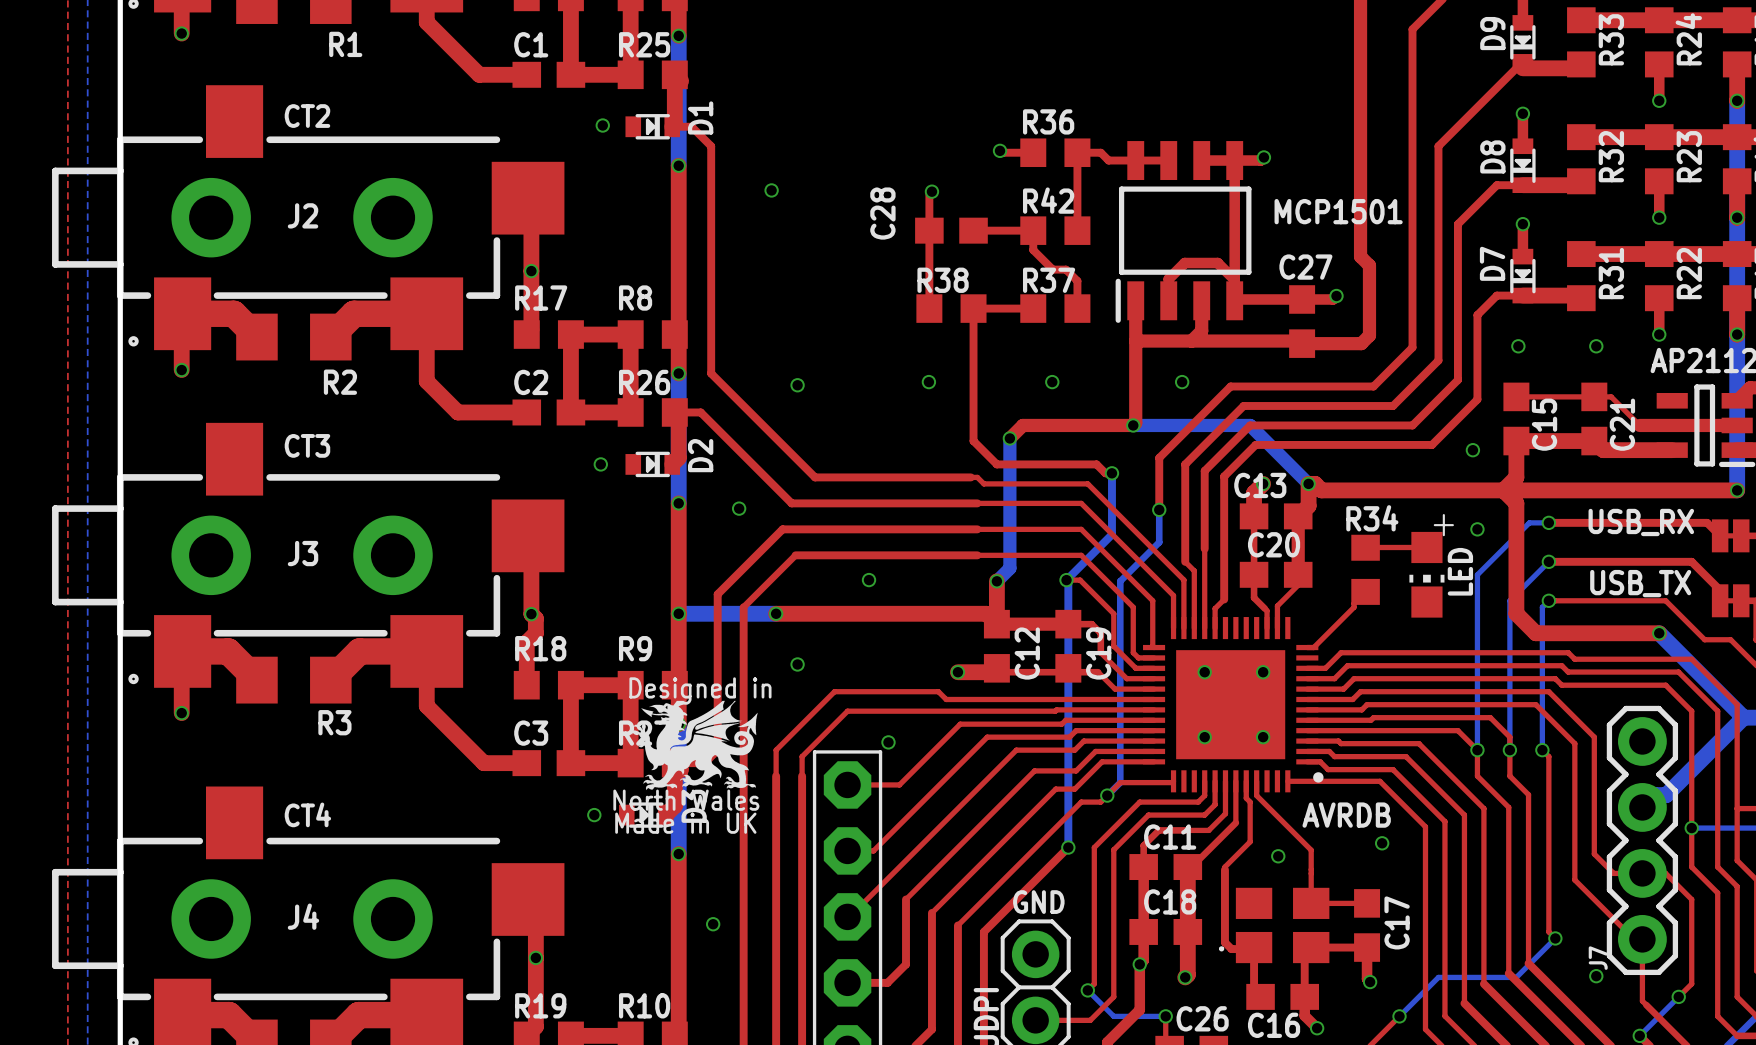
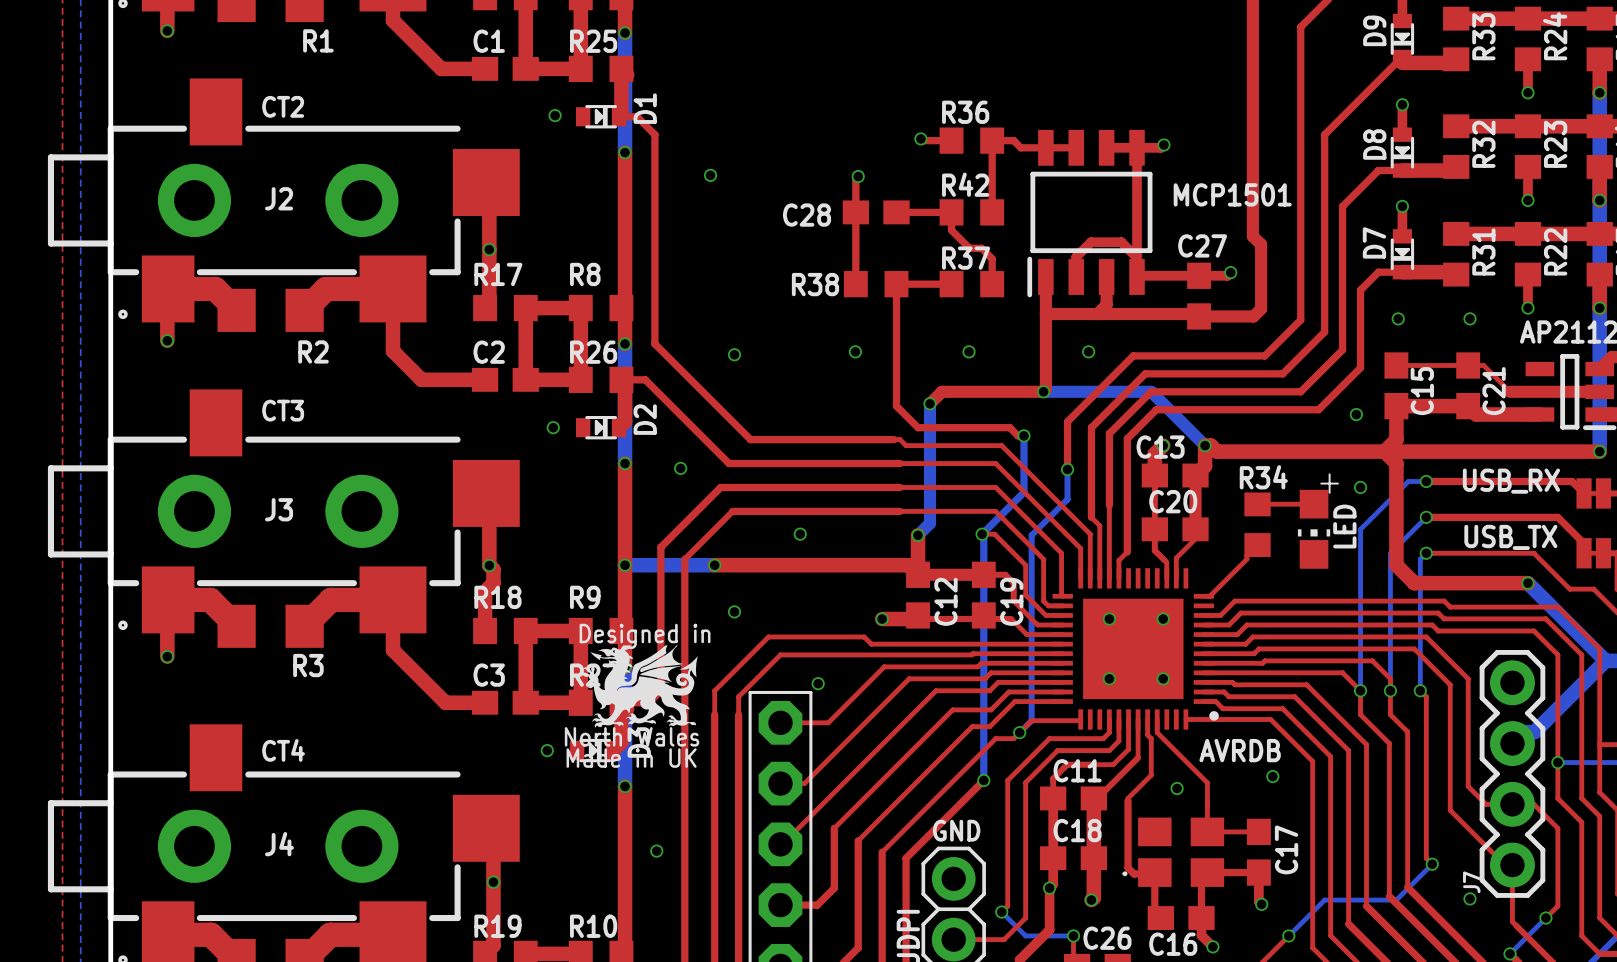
C28 name rotation: 0° (882, 213) -> 90° clockwise (807, 215)
R38 name position: R38 (943, 280) -> R38 (815, 284)

